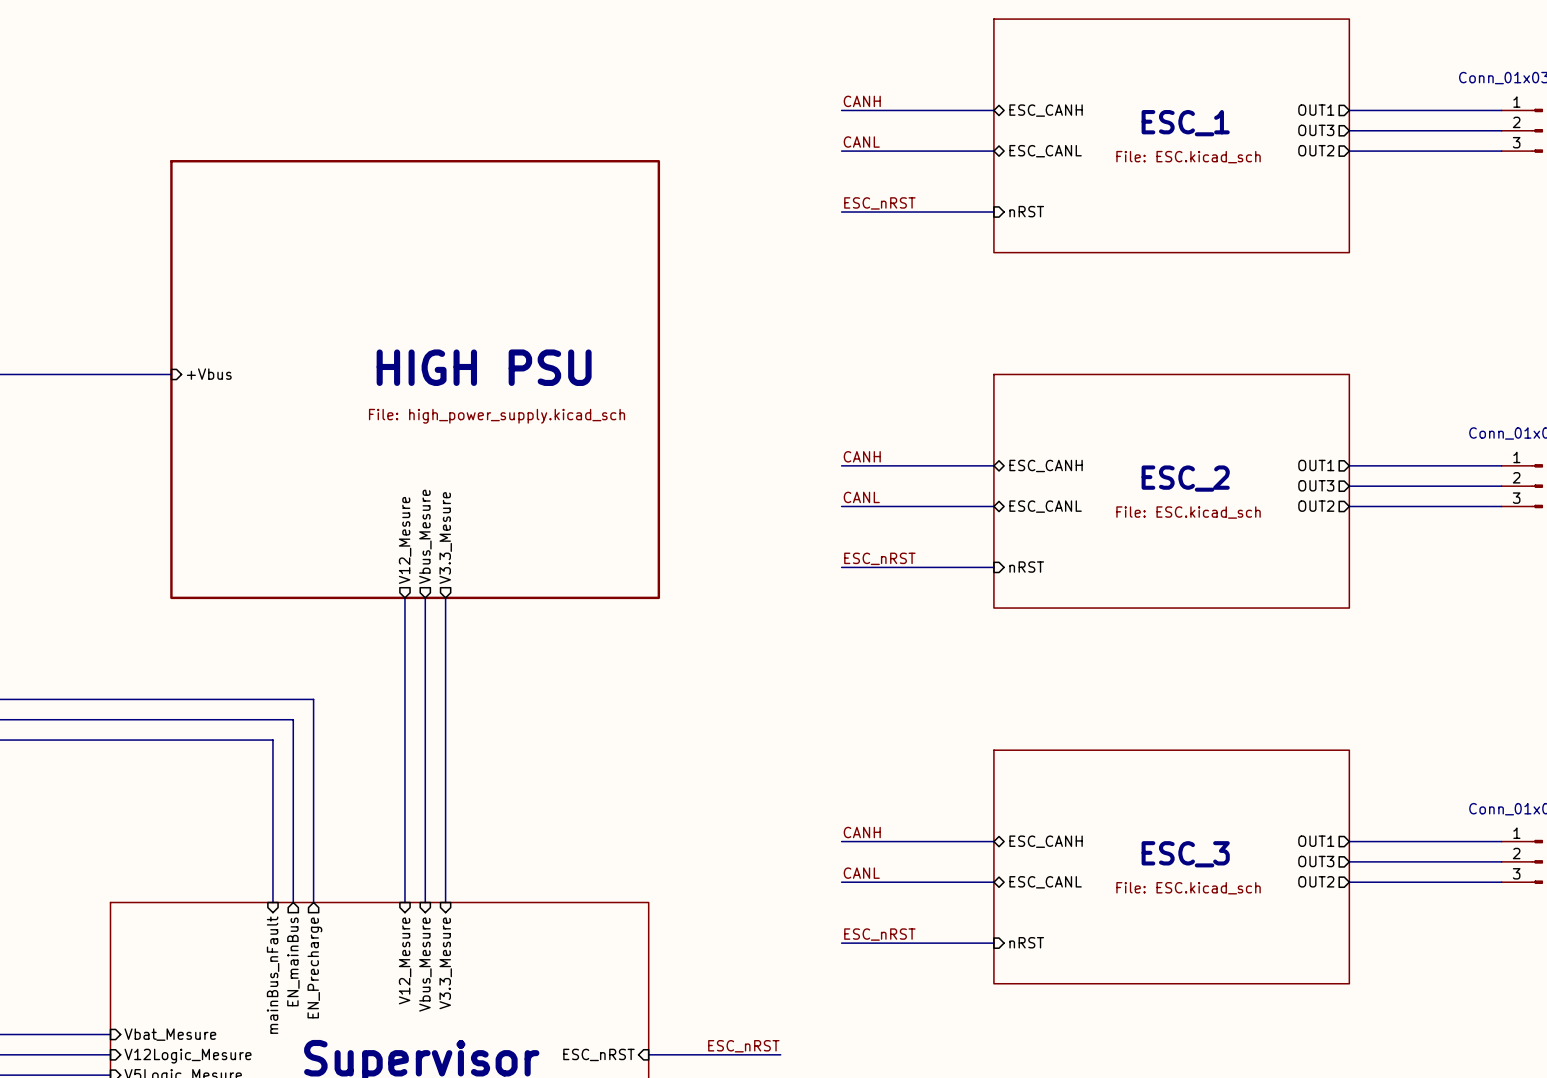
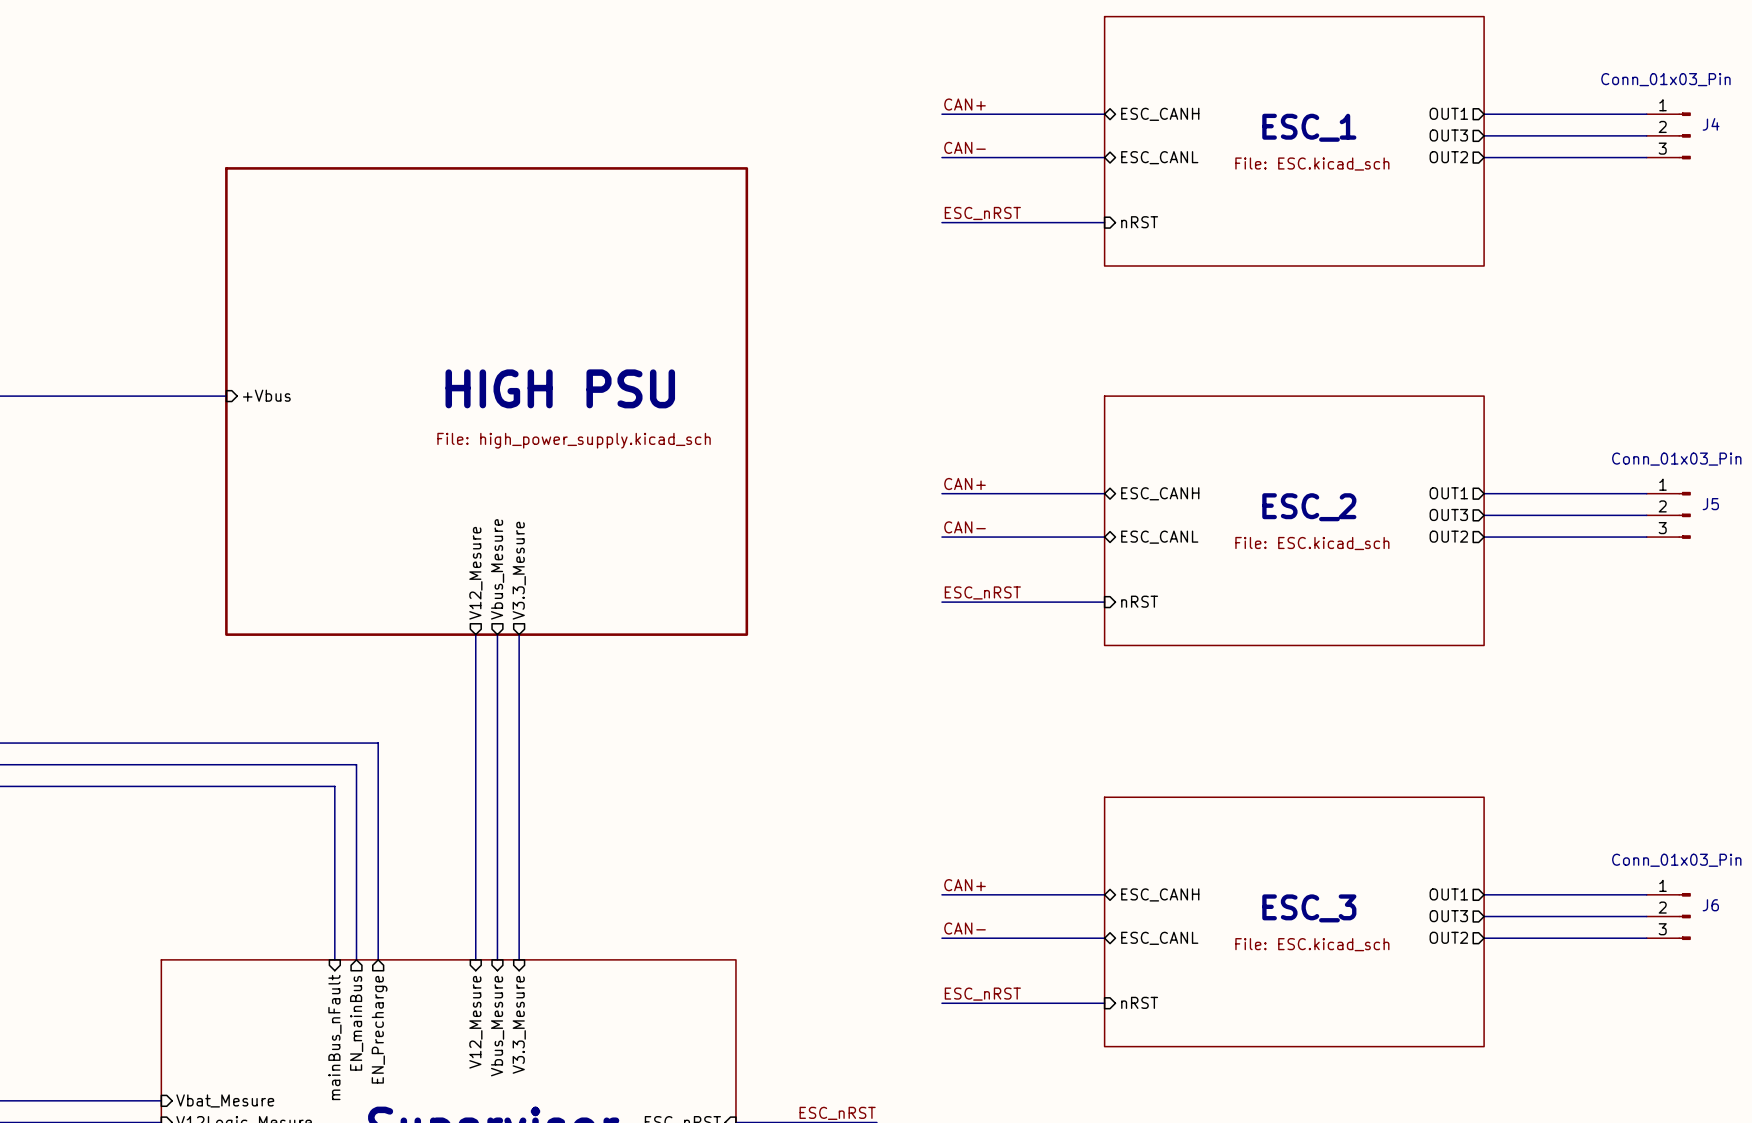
label: CANH (862, 101) -> CAN+ (965, 104)
label: CANL (861, 142) -> CAN- (965, 147)
label: CANH (862, 456) -> CAN+ (965, 484)
label: CANL (861, 497) -> CAN- (965, 527)
label: CANH (862, 832) -> CAN+ (965, 885)
label: CANL (861, 873) -> CAN- (965, 928)

